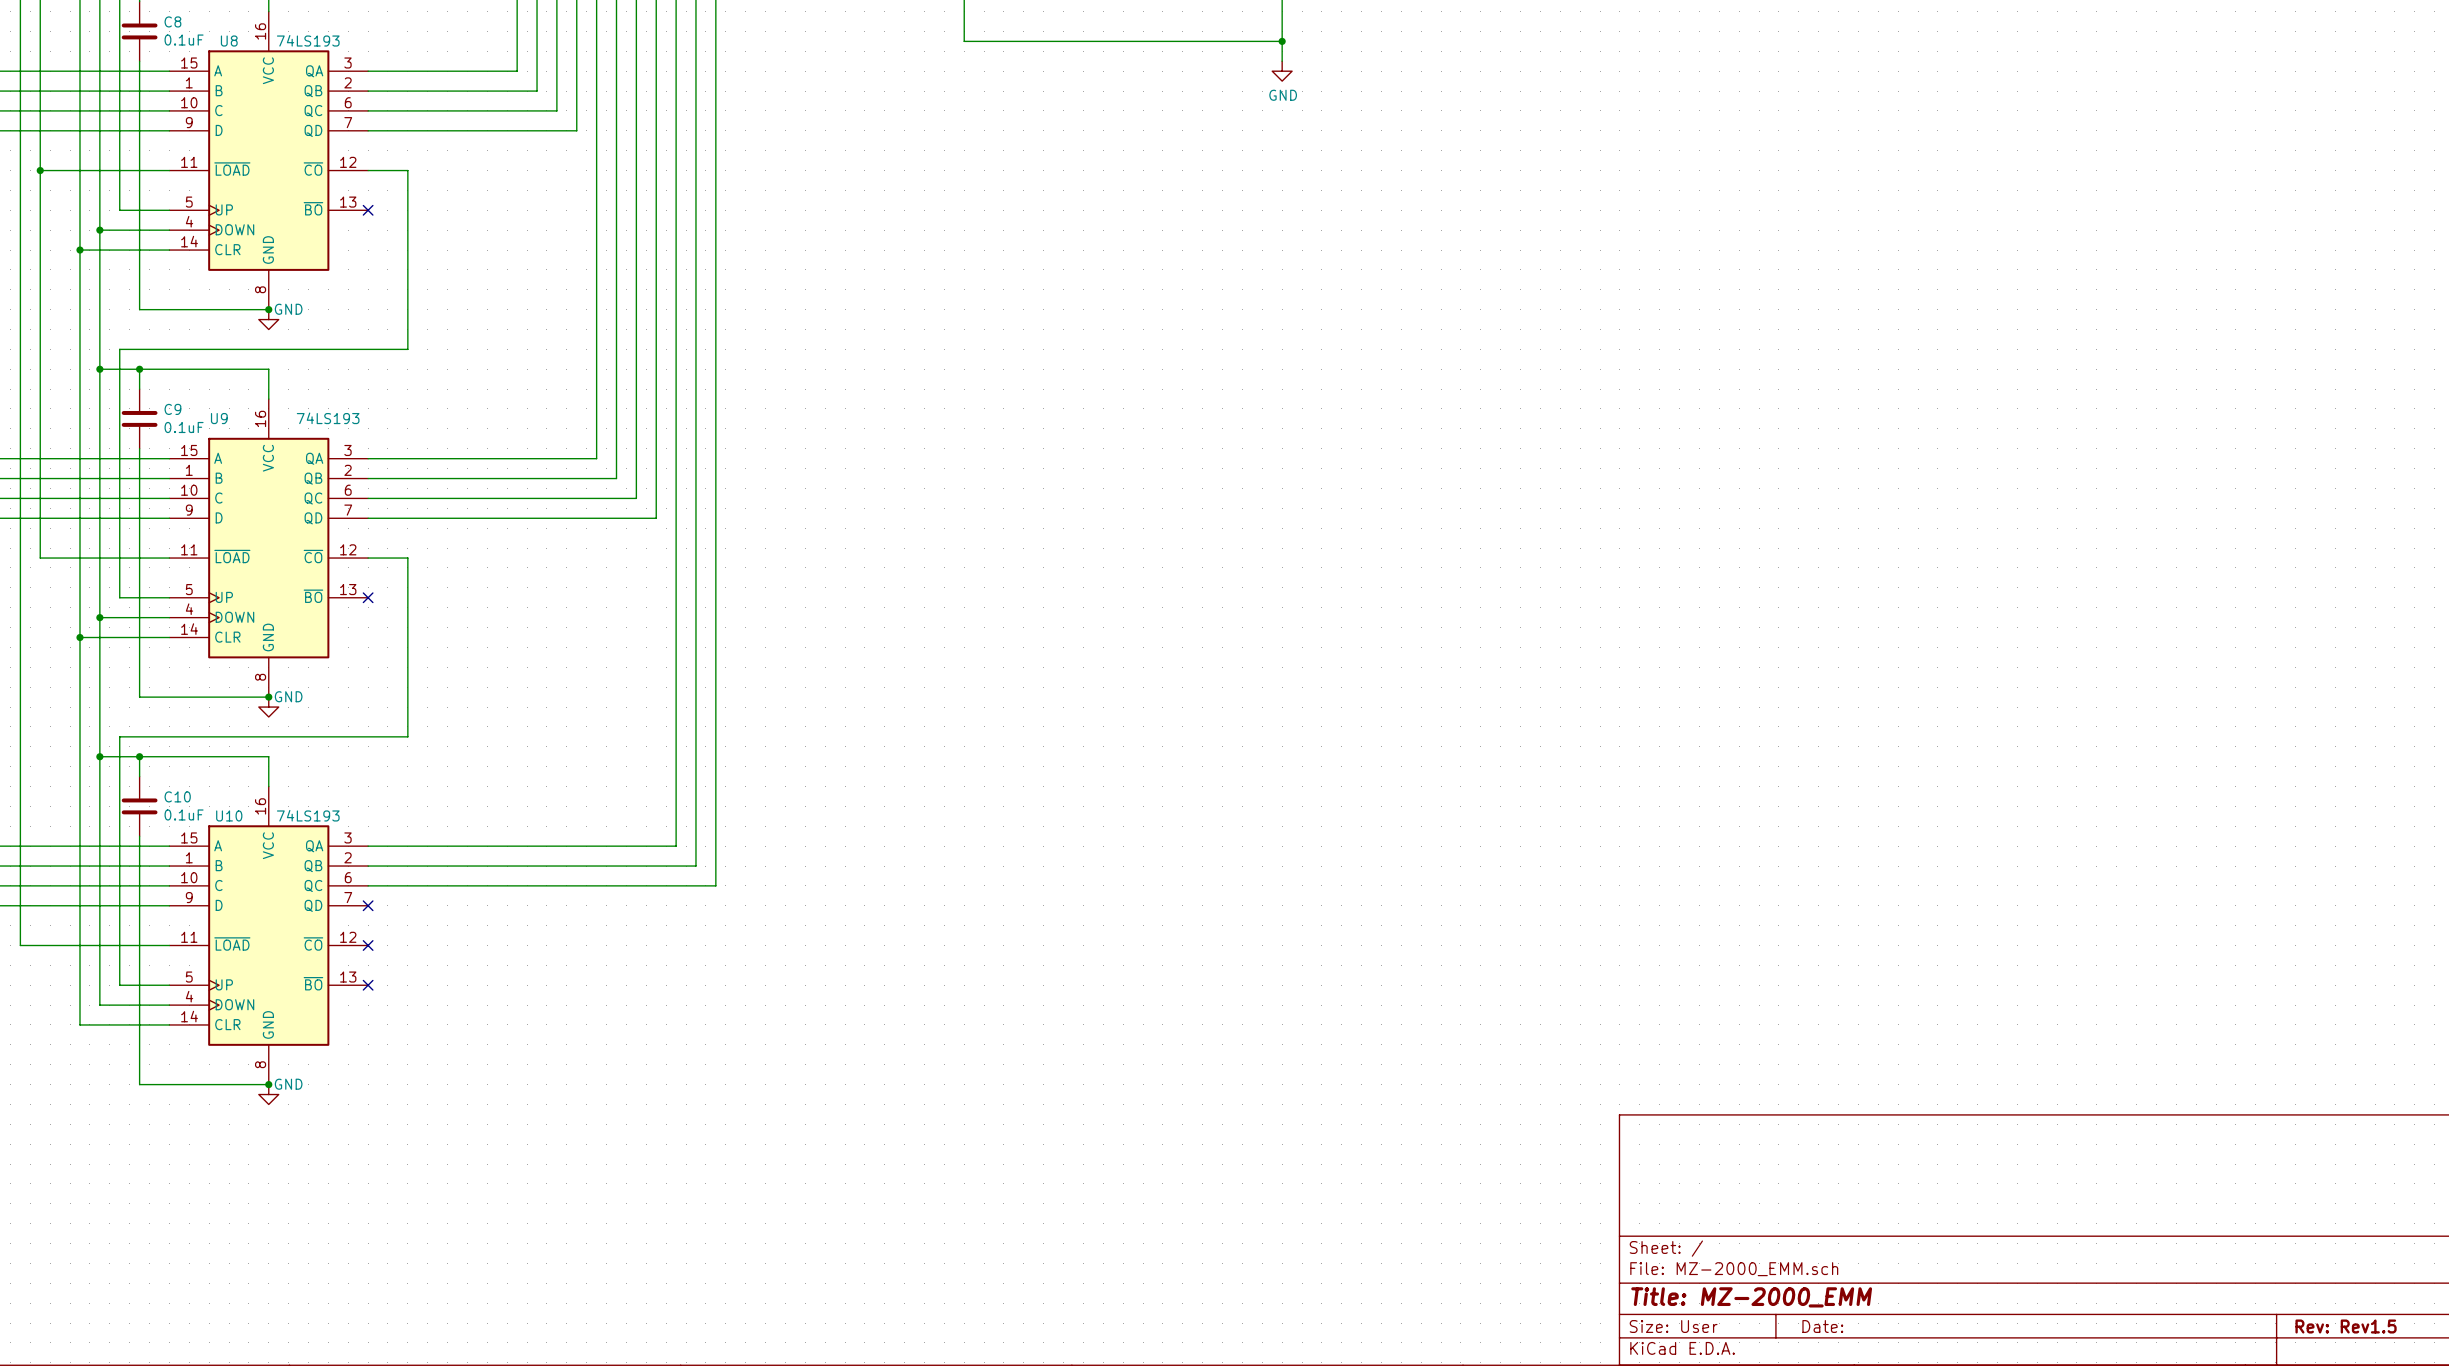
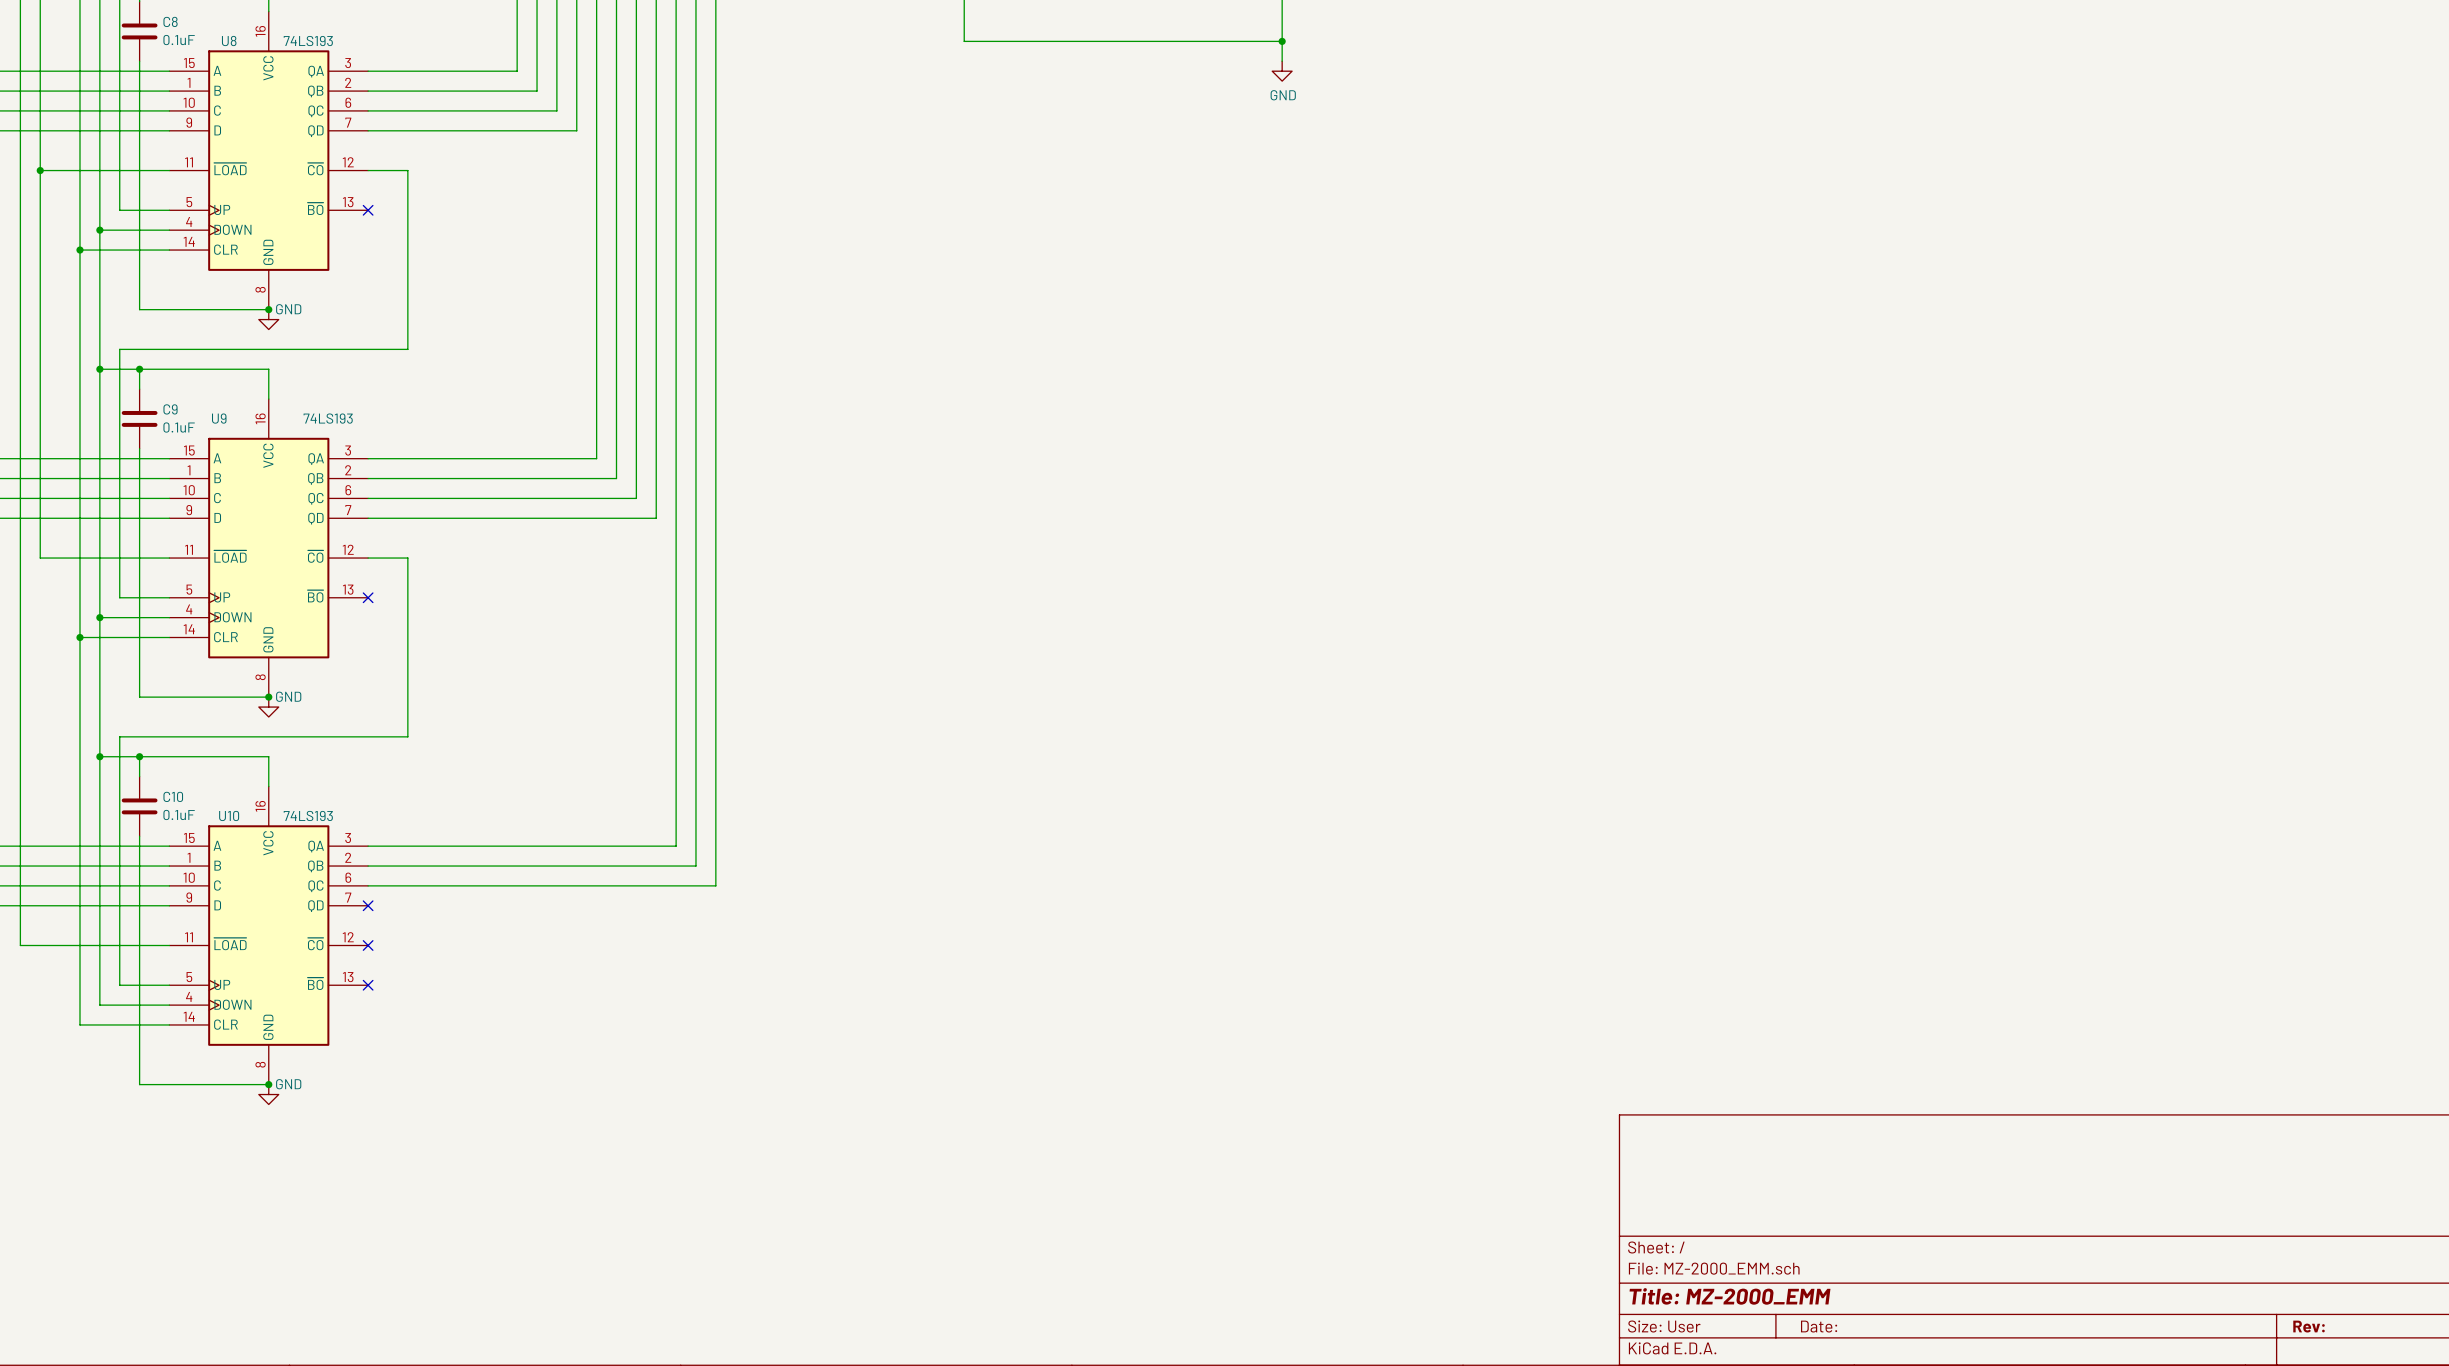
title block: Rev: Rev1.5 (2346, 1326) -> Rev: (2309, 1326)

